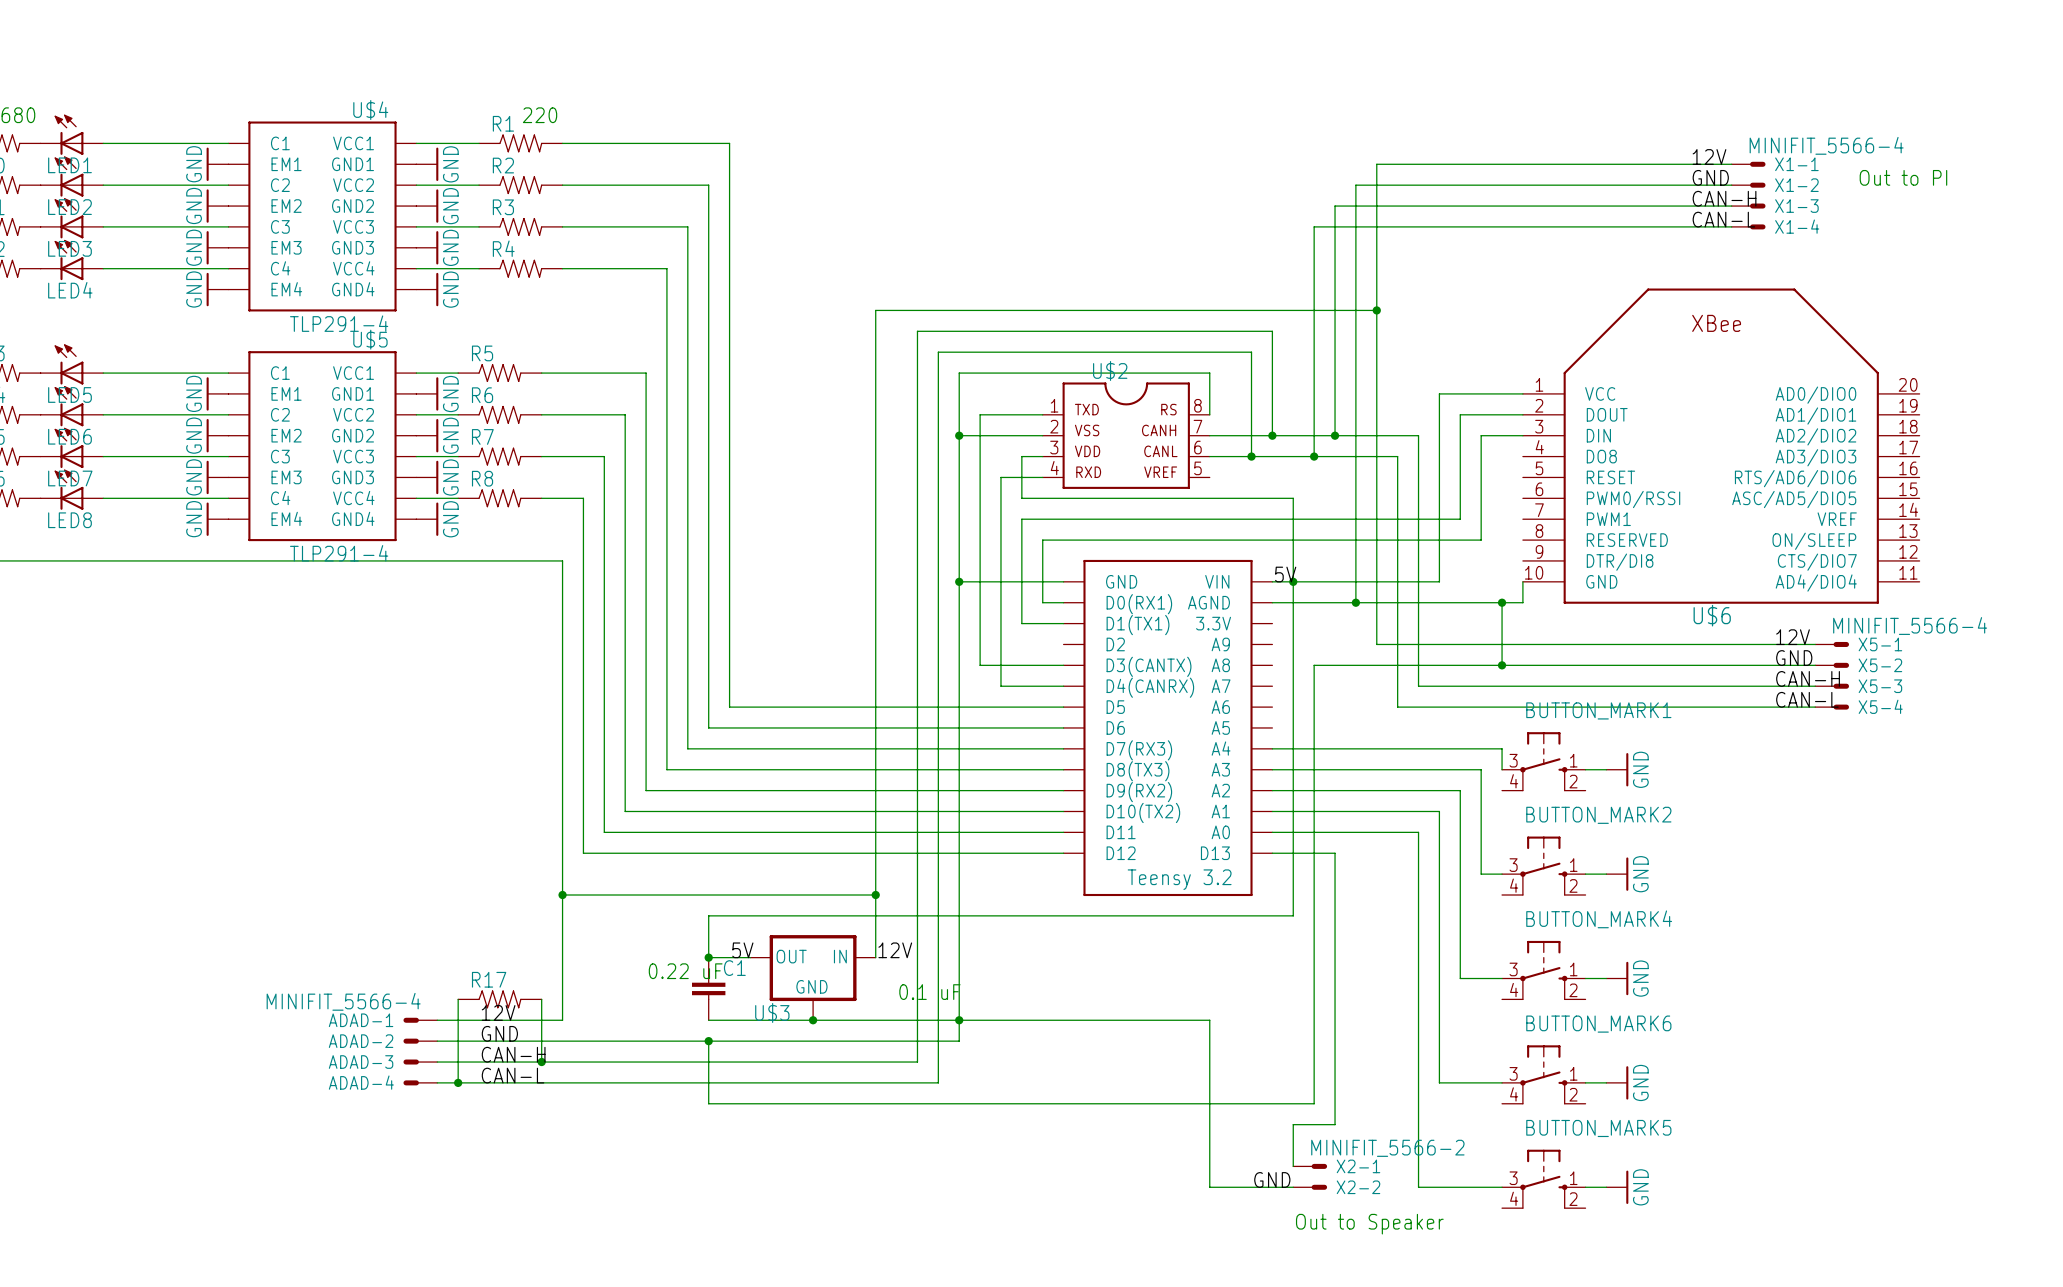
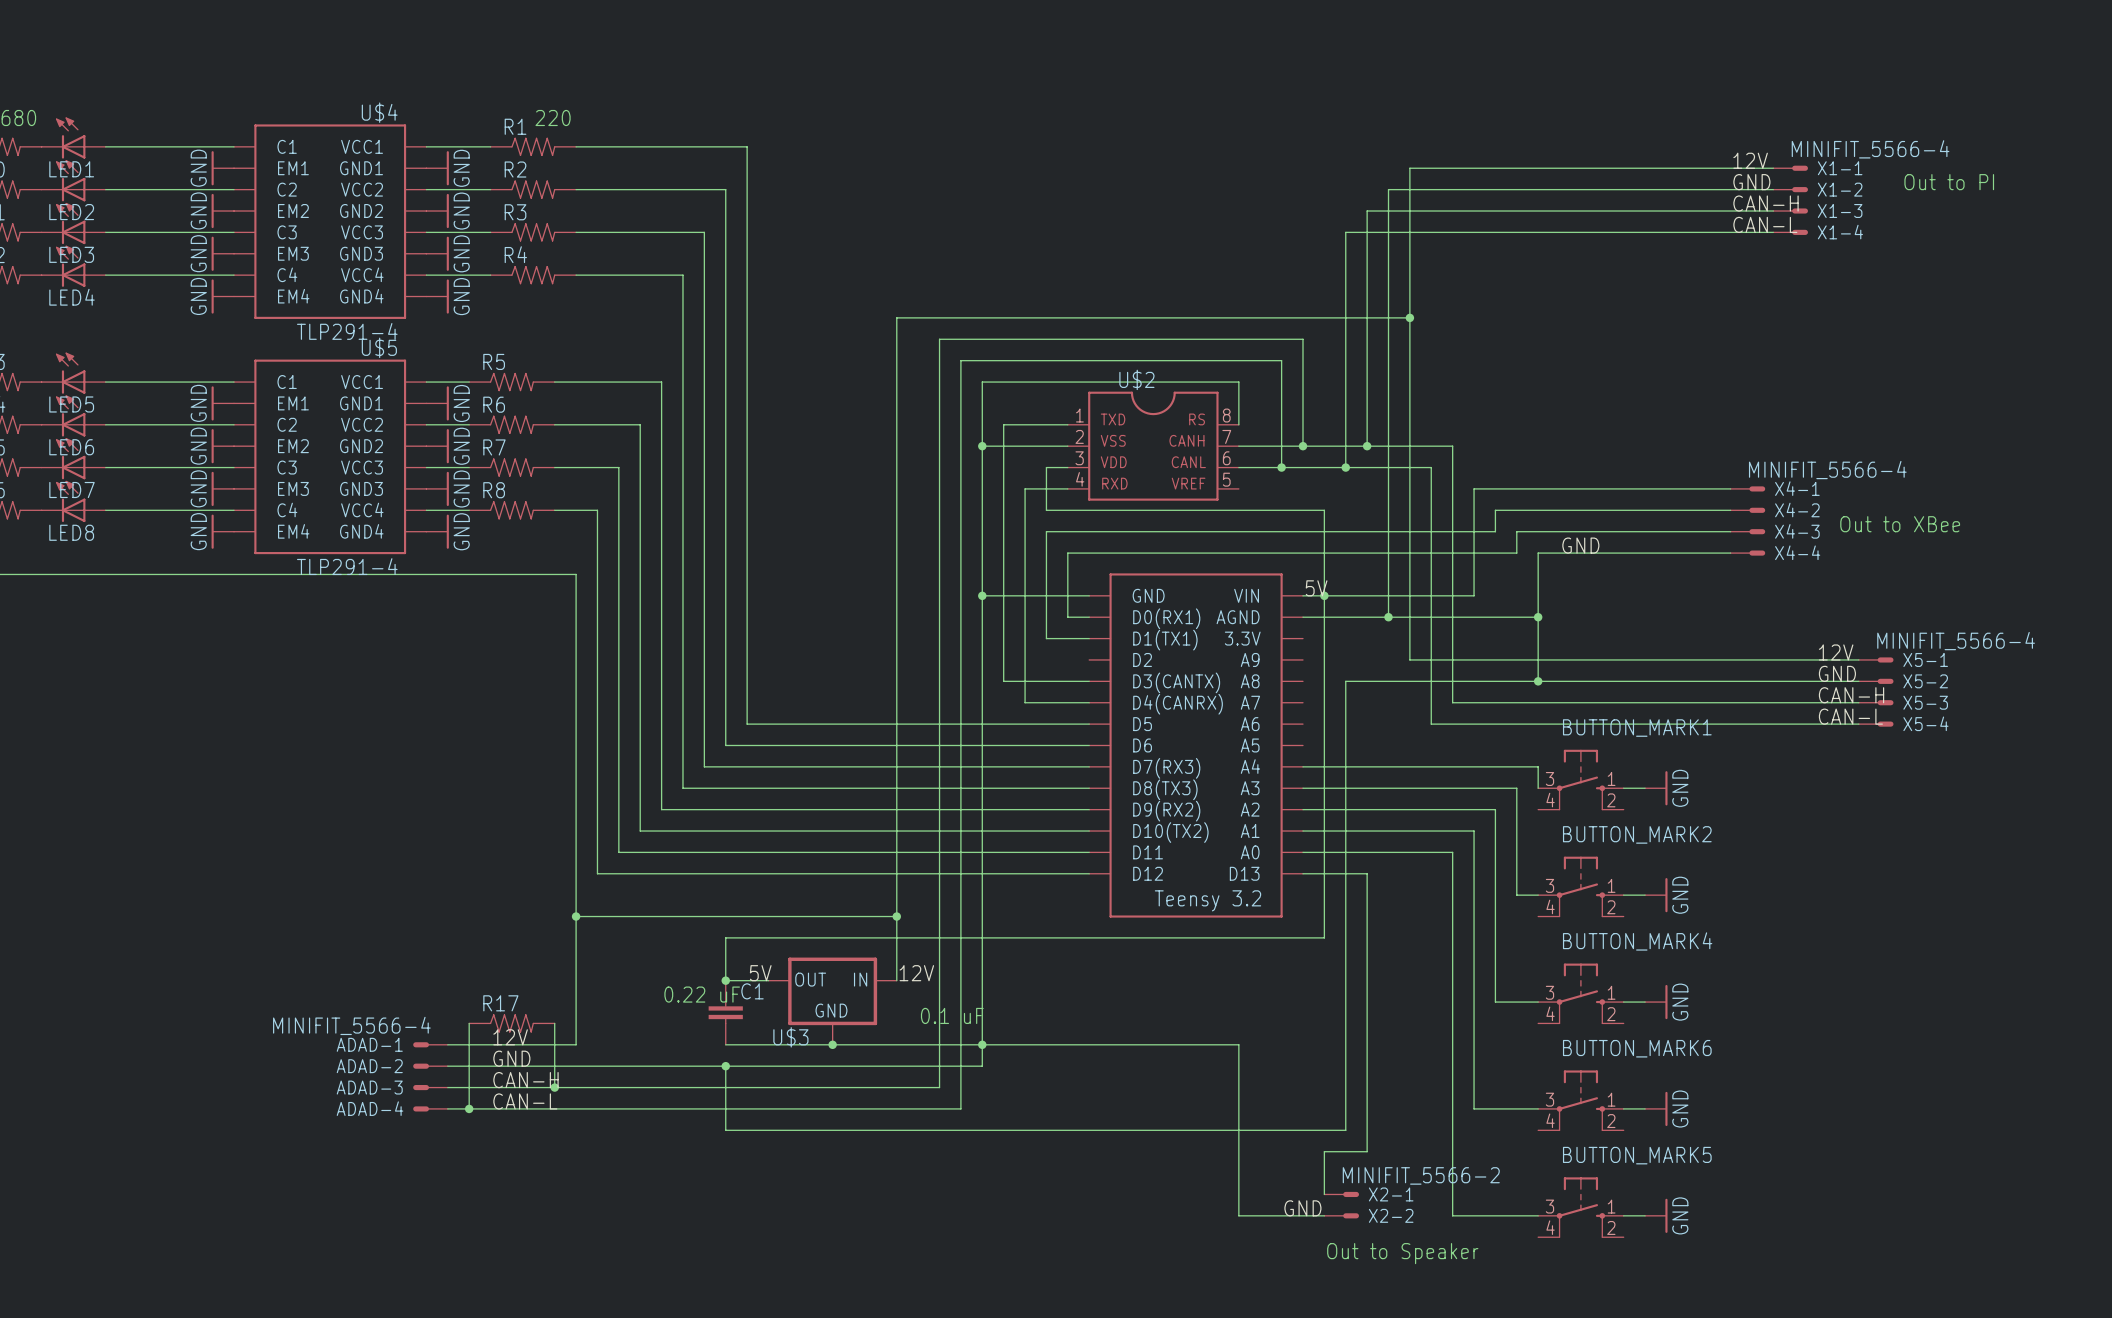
wire: (1522, 393) (1439, 393) (1439, 477) -> (1730, 488) (1474, 488)
wire: (1522, 414) (1460, 414) (1460, 498) -> (1730, 510) (1495, 510)
wire: (1522, 435) (1481, 435) (1481, 519) -> (1730, 531) (1516, 531)
U$6: (1721, 446) -> none
X4-1: none -> MINIFIT_5566-4 (1747, 488)
X4-2: none -> (1747, 510)
text: none -> Out to XBee (1900, 524)
X4-3: none -> (1747, 531)
label: none -> GND (1580, 545)
X4-4: none -> (1747, 553)
wire: (1522, 581) (1522, 602) (1502, 602) -> (1730, 553) (1538, 553) (1538, 617)

